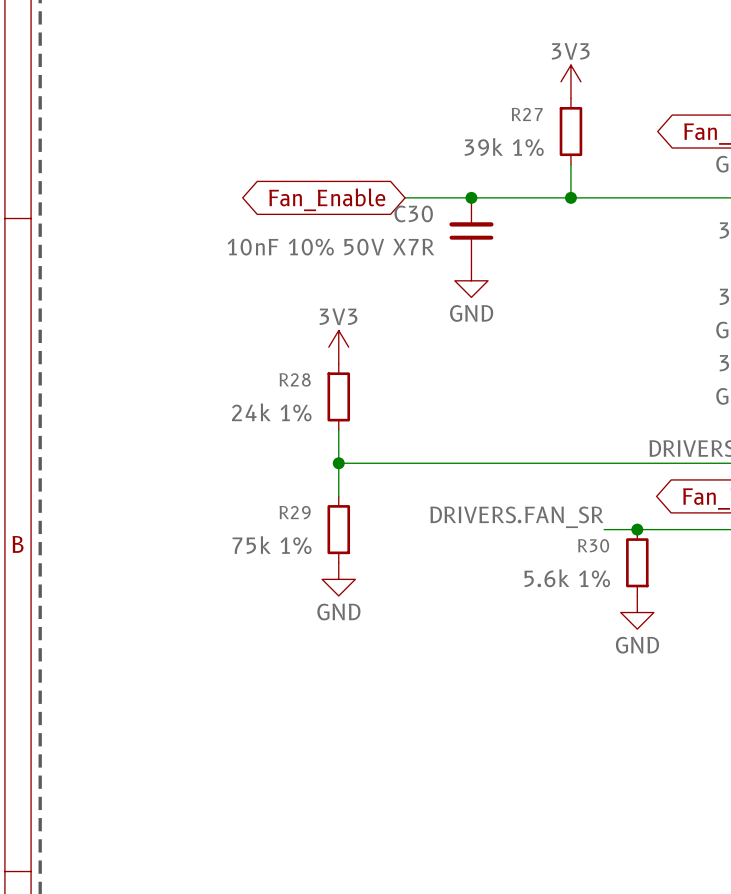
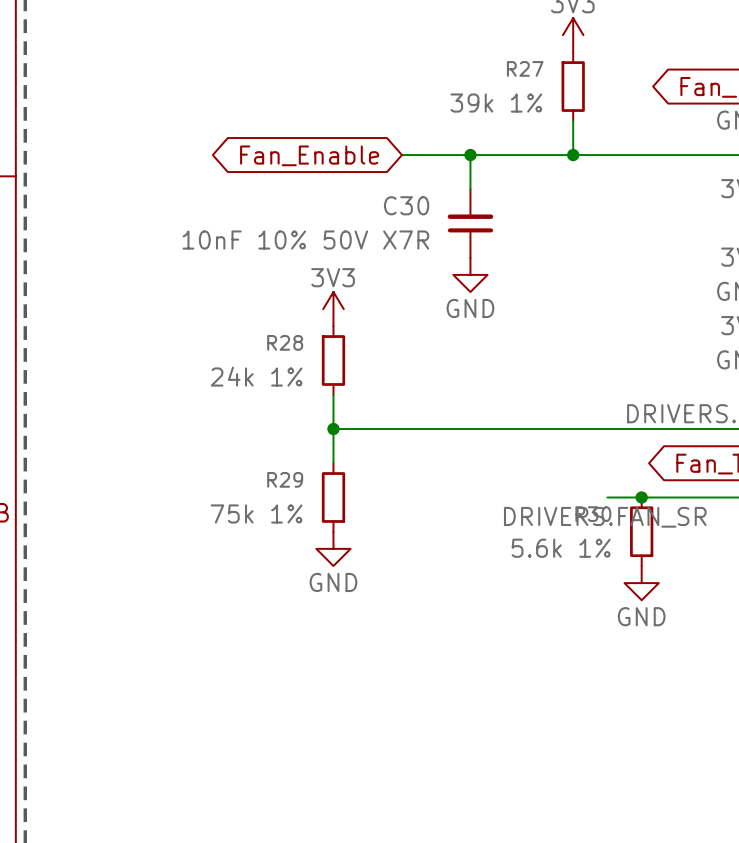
C30 position: (471, 231) -> (470, 223)
power symbol position: GND (471, 280) -> GND (470, 274)
label position: DRIVERS.FAN_SR (516, 517) -> DRIVERS.FAN_SR (605, 517)

